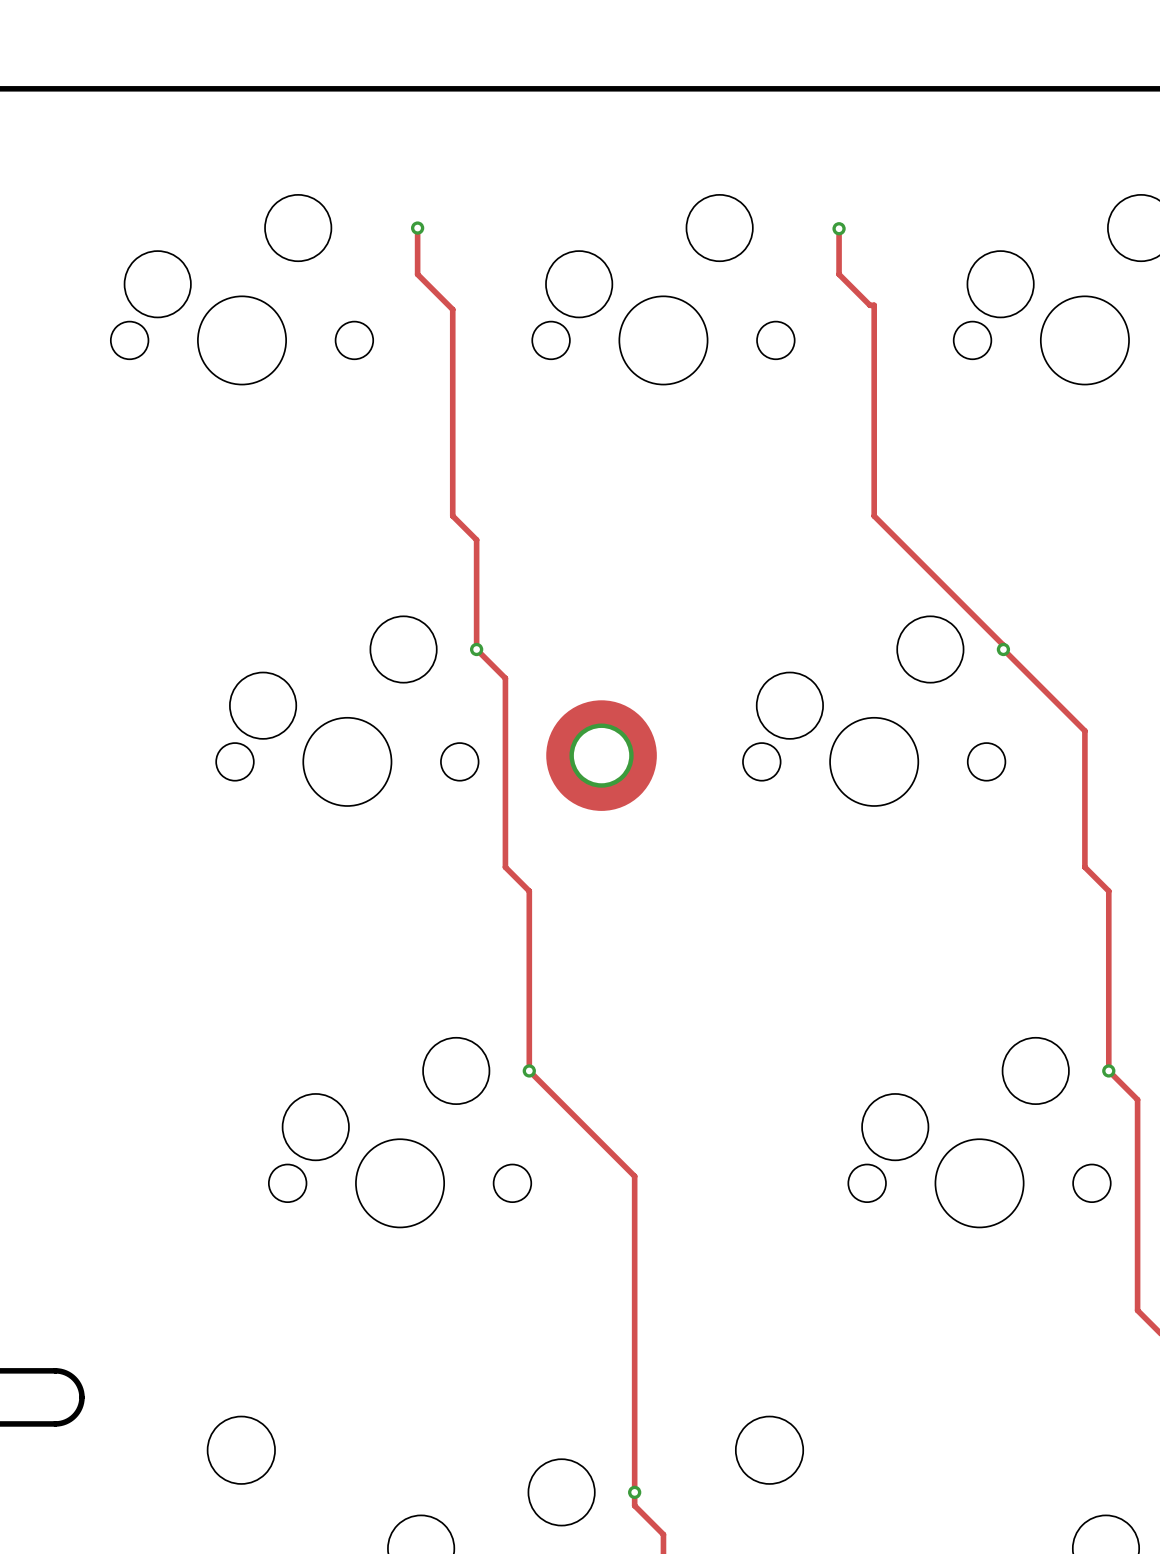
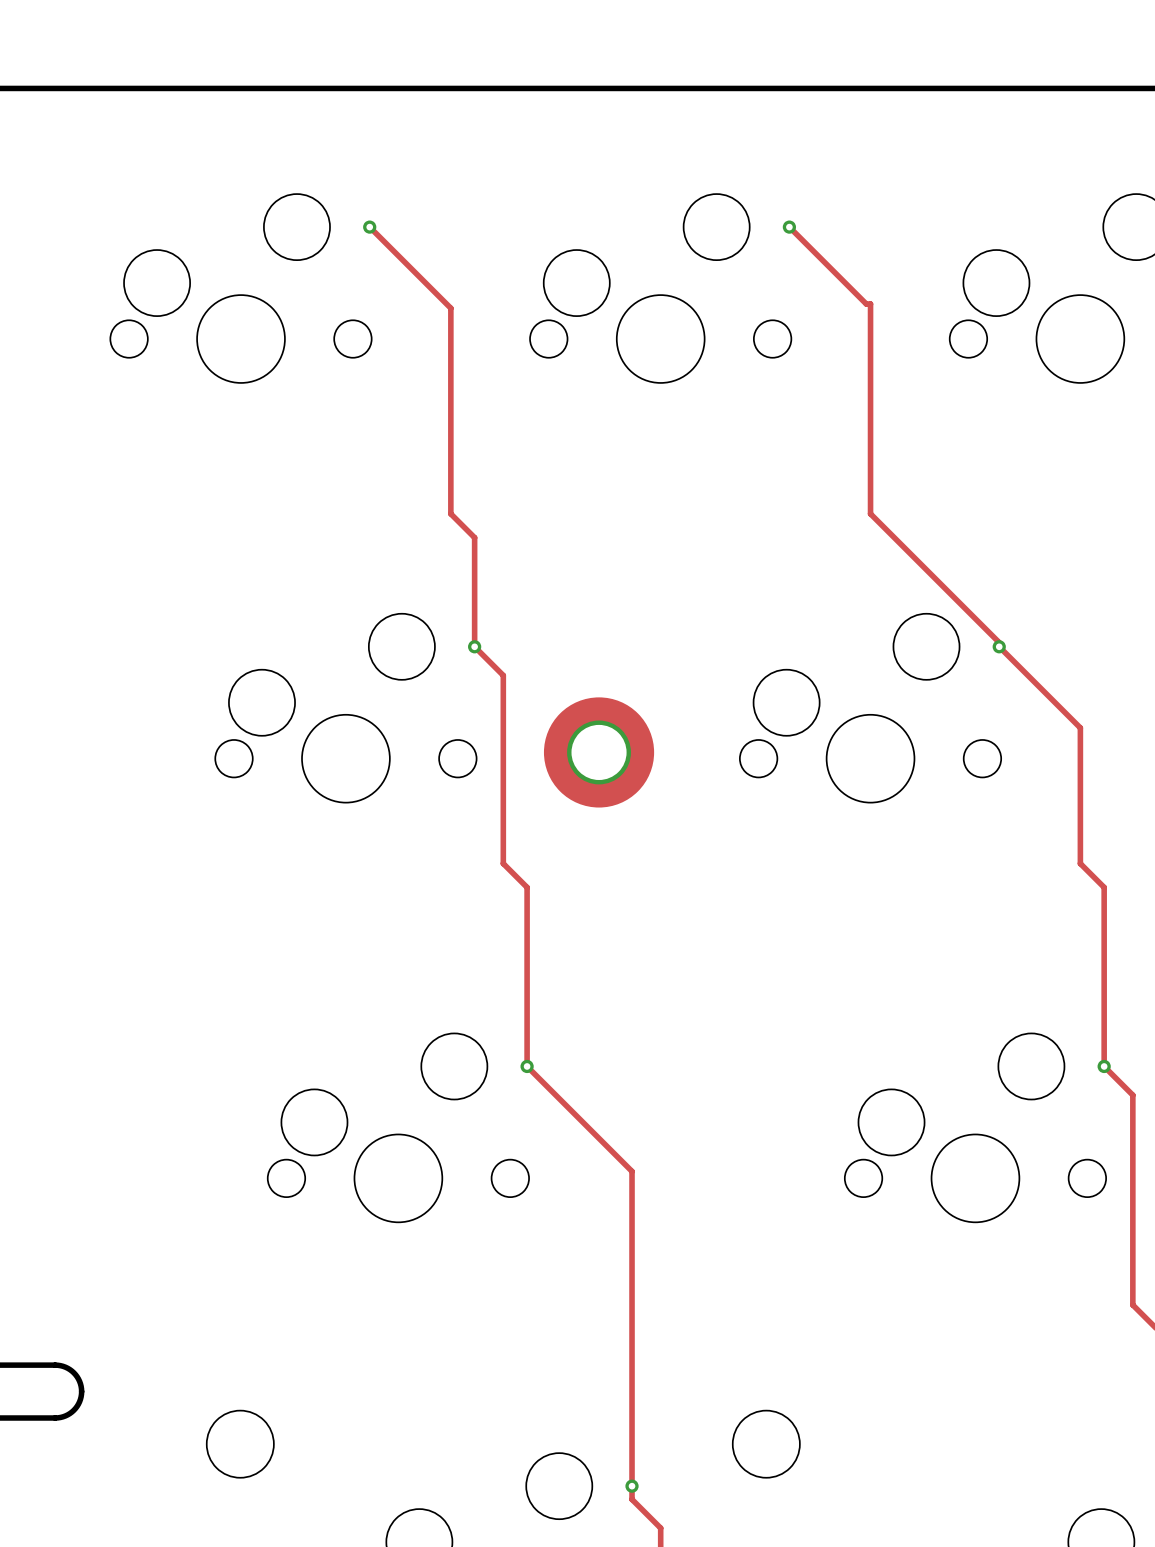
track: (417, 228) (417, 274) -> (369, 227) (415, 273)
via position: (417, 228) -> (369, 227)
track: (839, 228) (839, 274) -> (789, 227) (835, 273)
via position: (839, 228) -> (789, 227)

